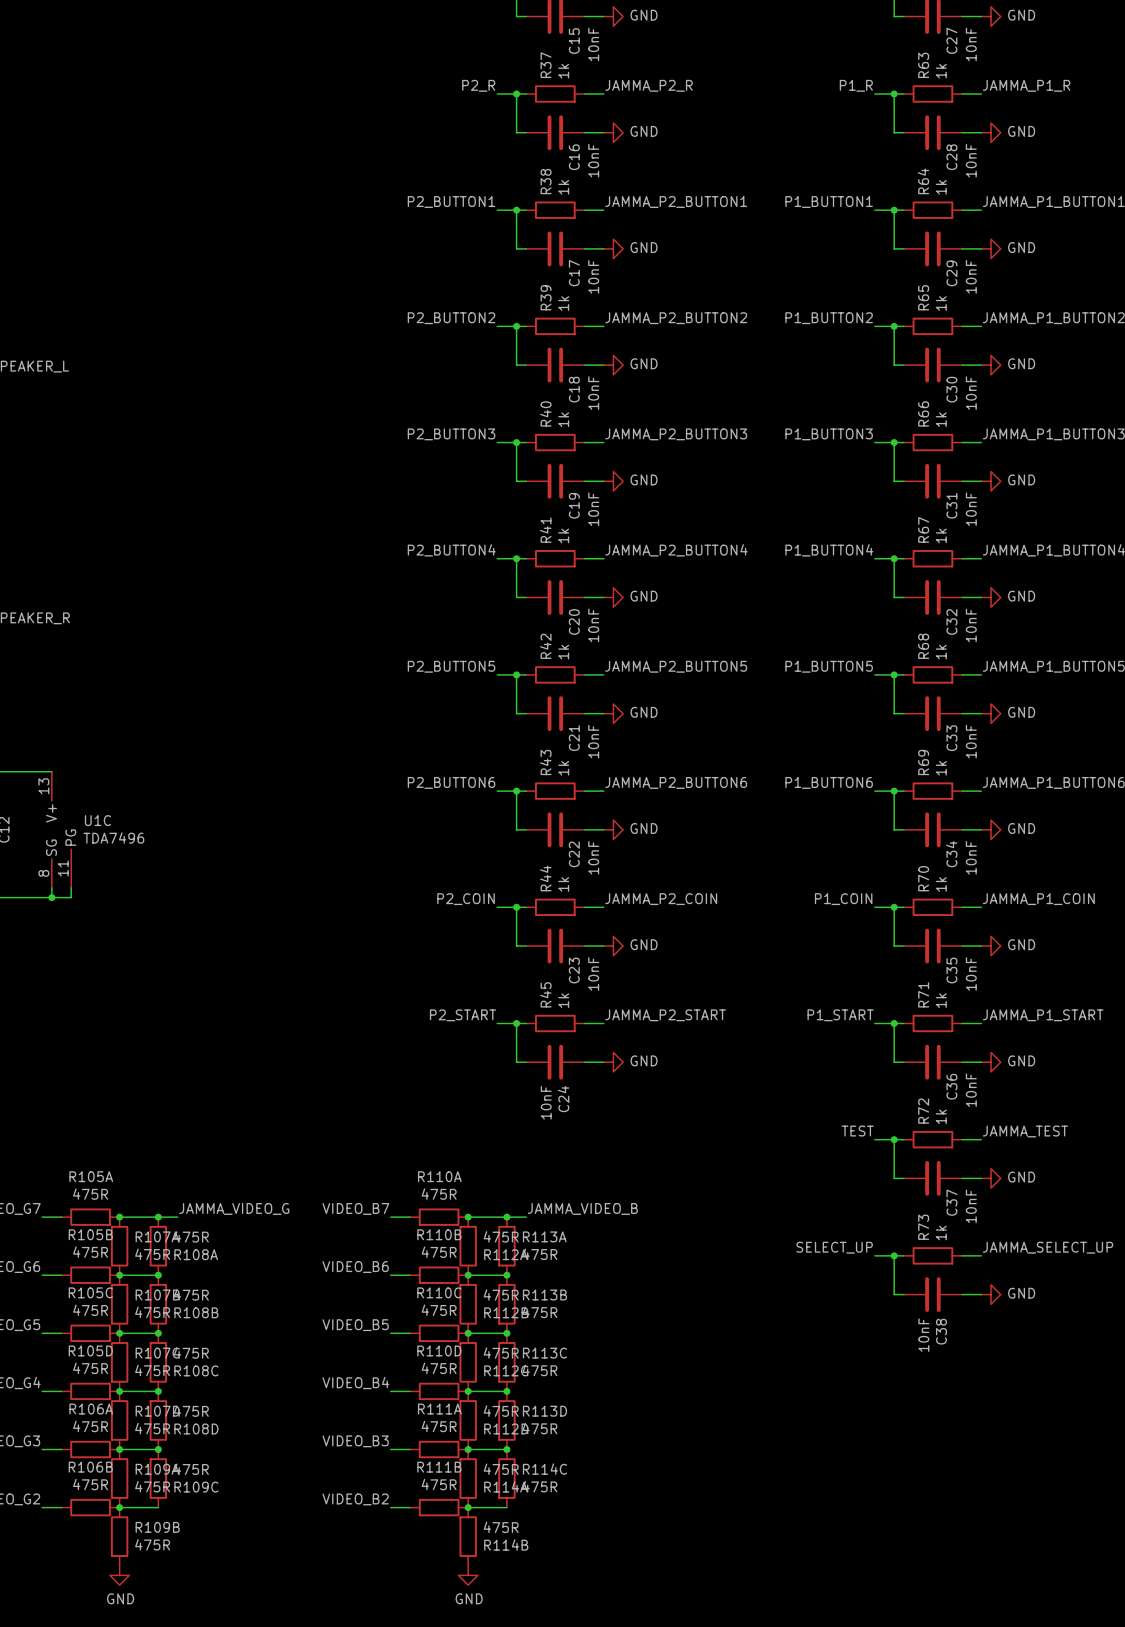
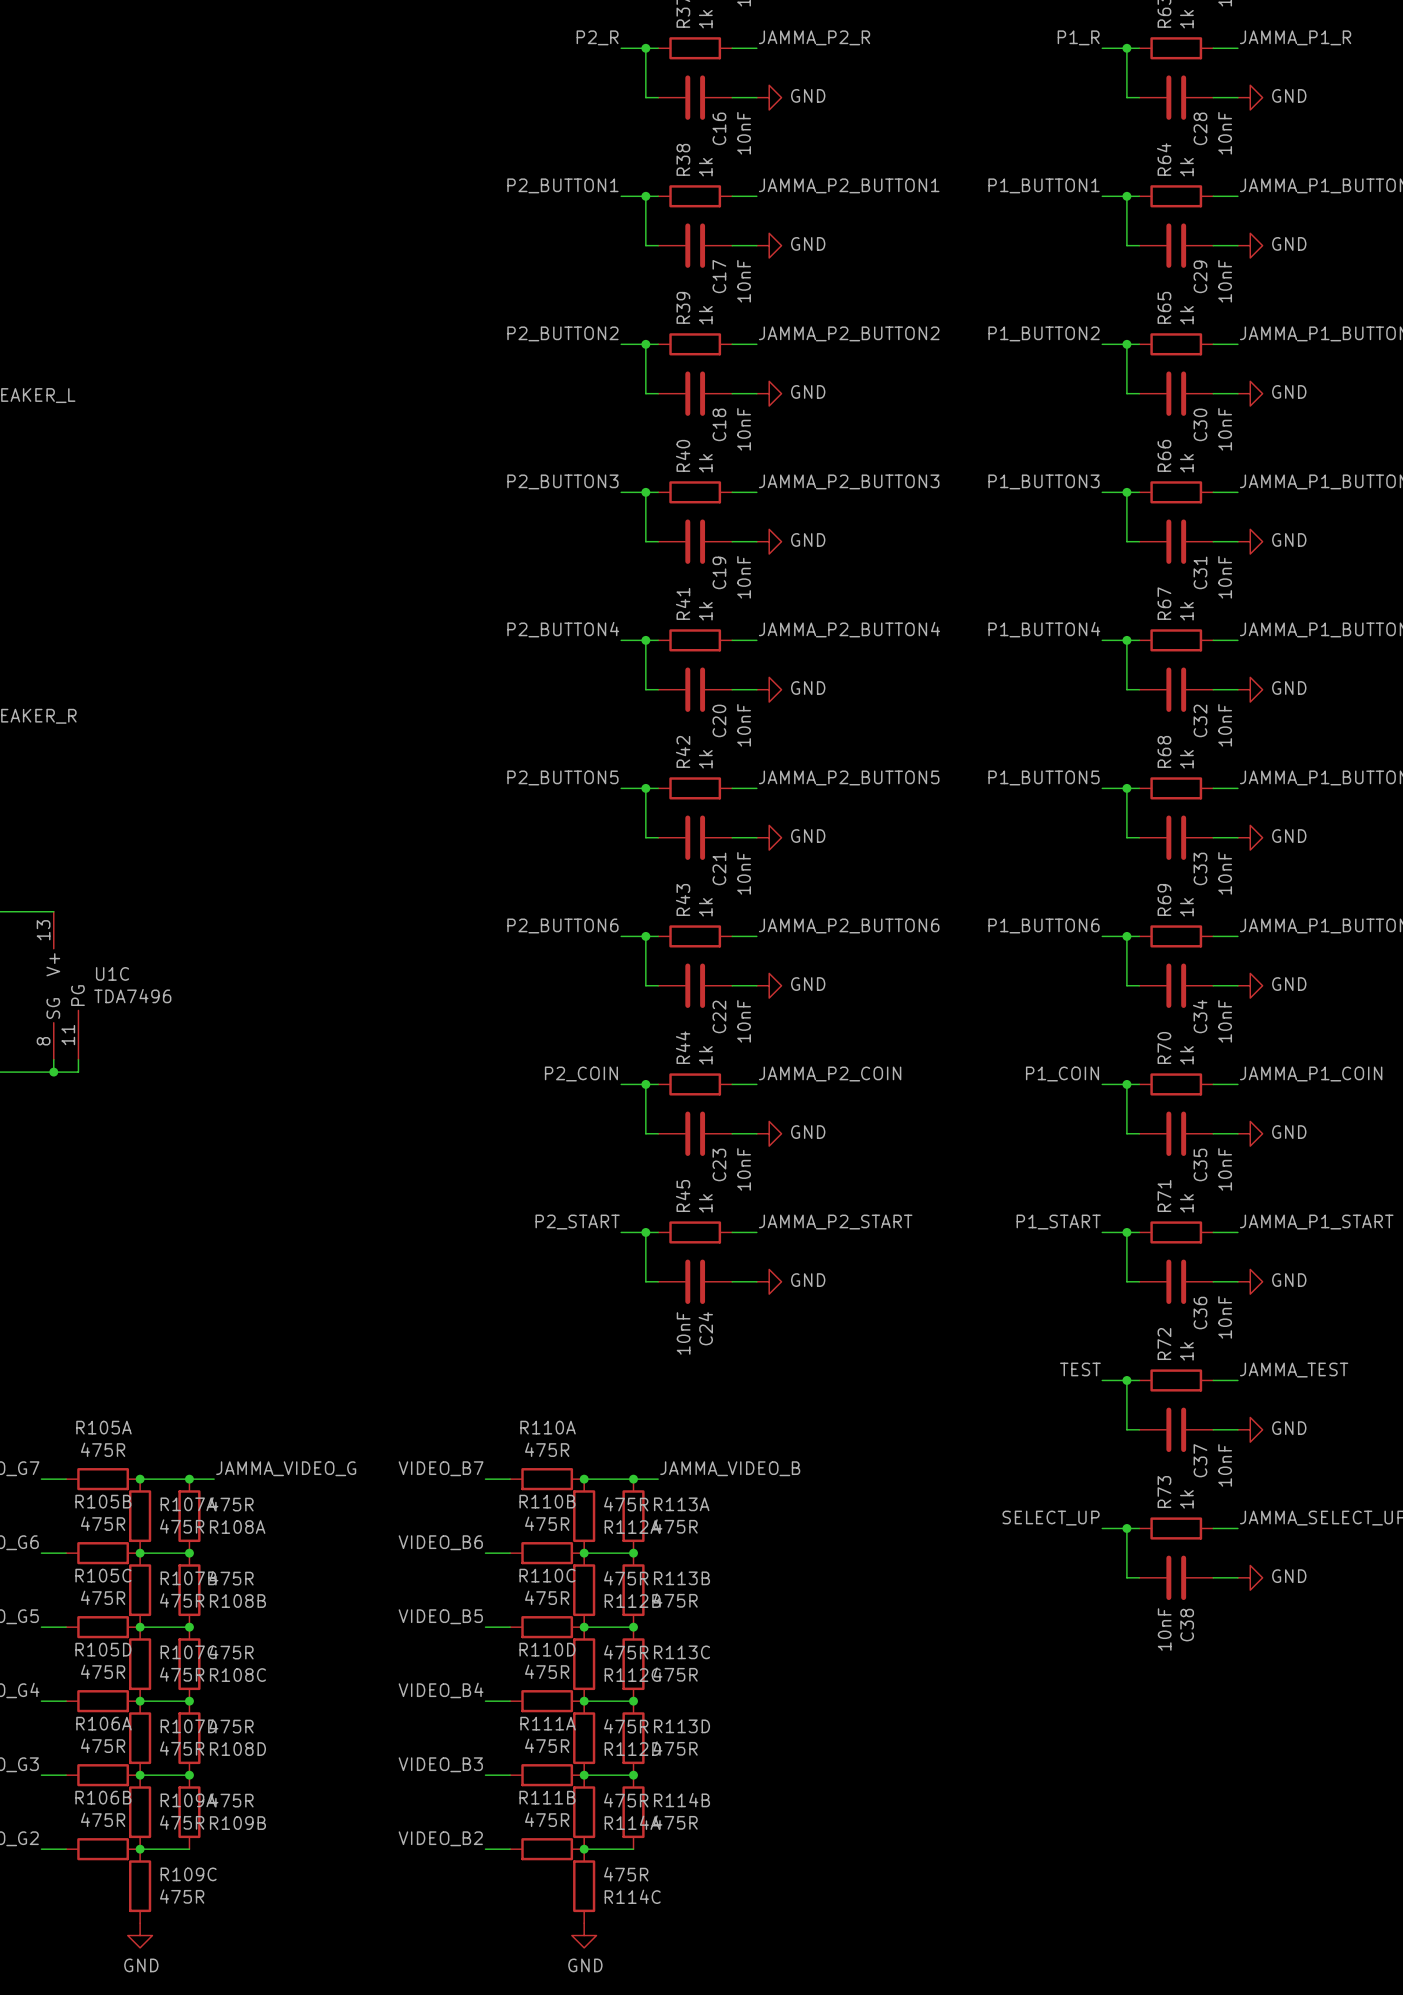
R114C name: R114C (544, 1469) -> R114B (682, 1800)
R109C name: R109C (196, 1487) -> R109B (237, 1823)
R109B name: R109B (157, 1527) -> R109C (188, 1874)
R114B name: R114B (506, 1544) -> R114C (632, 1896)

